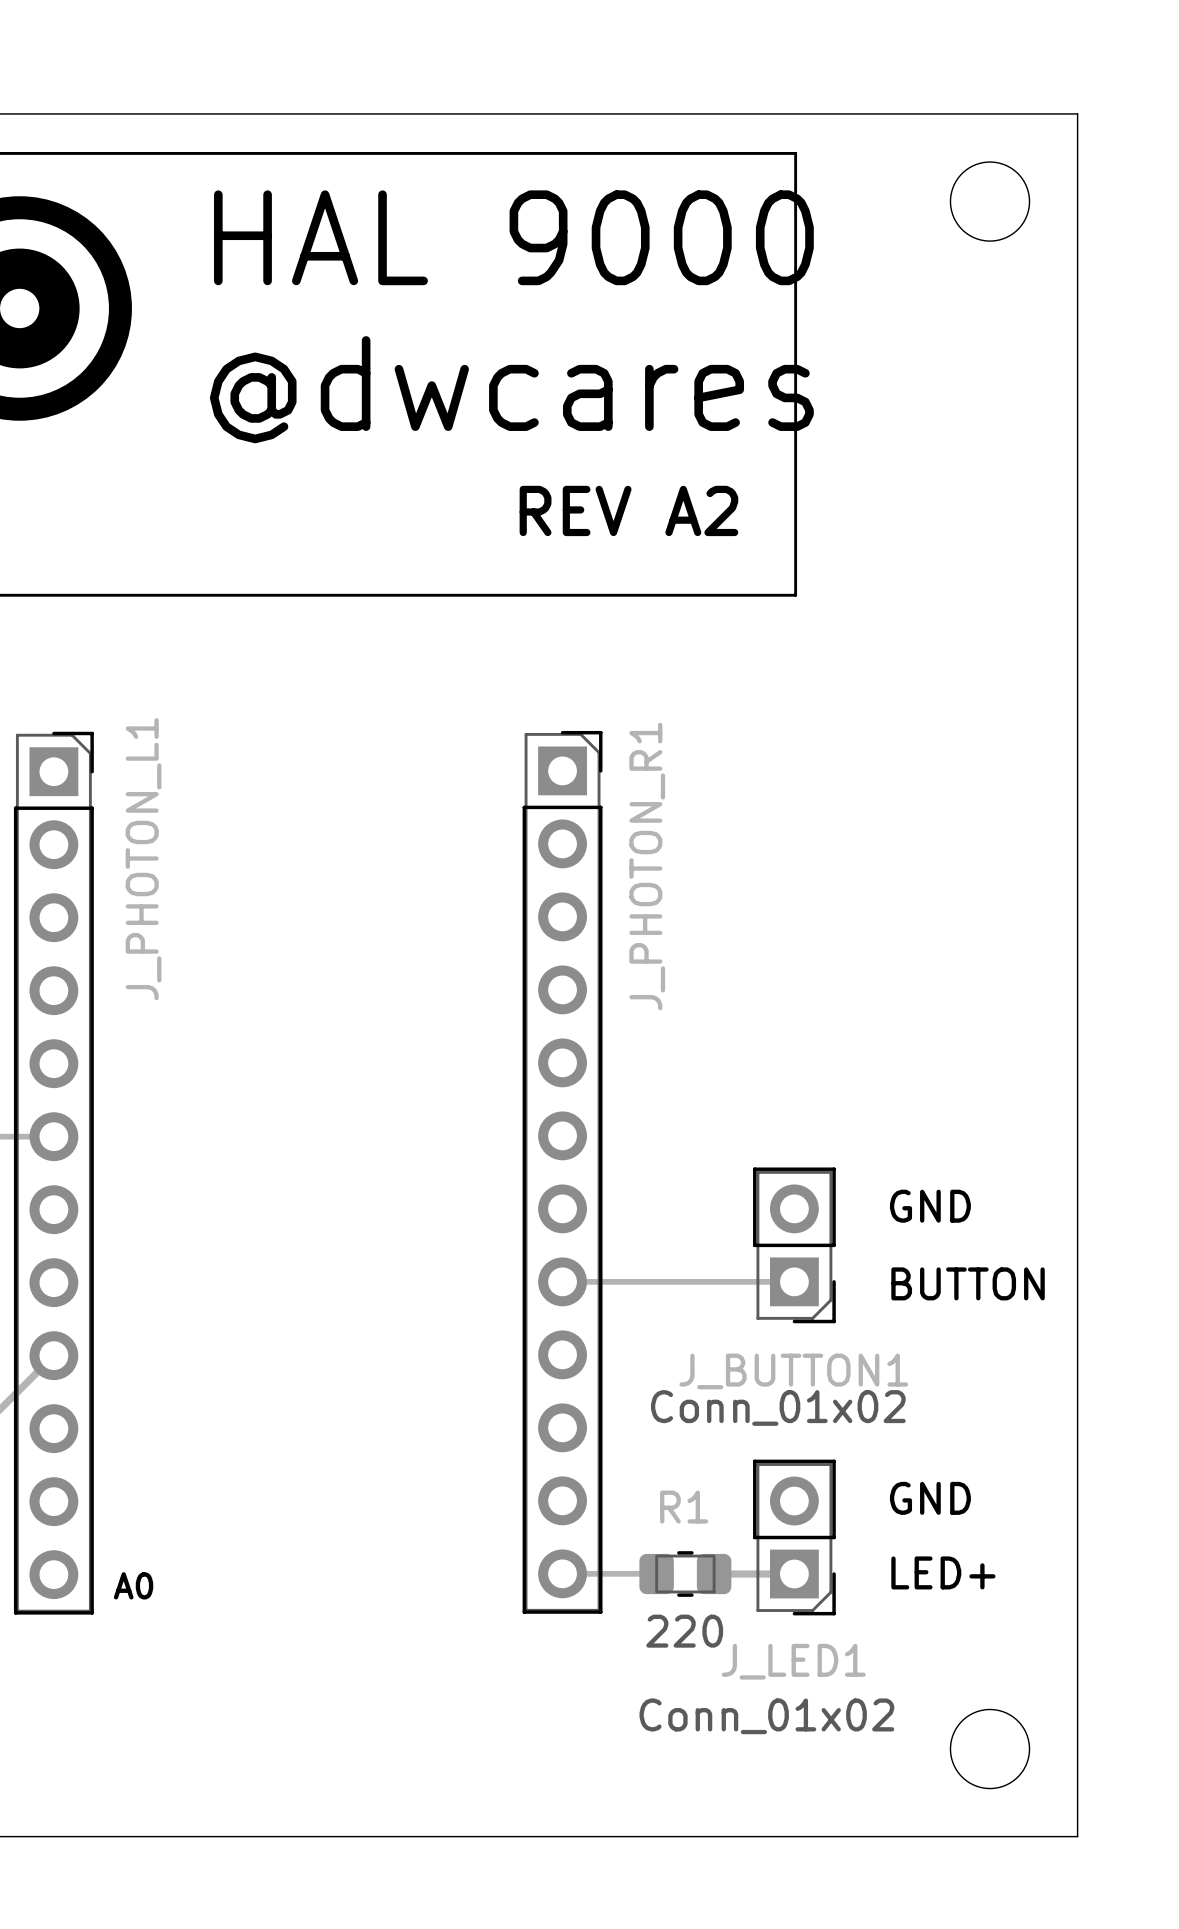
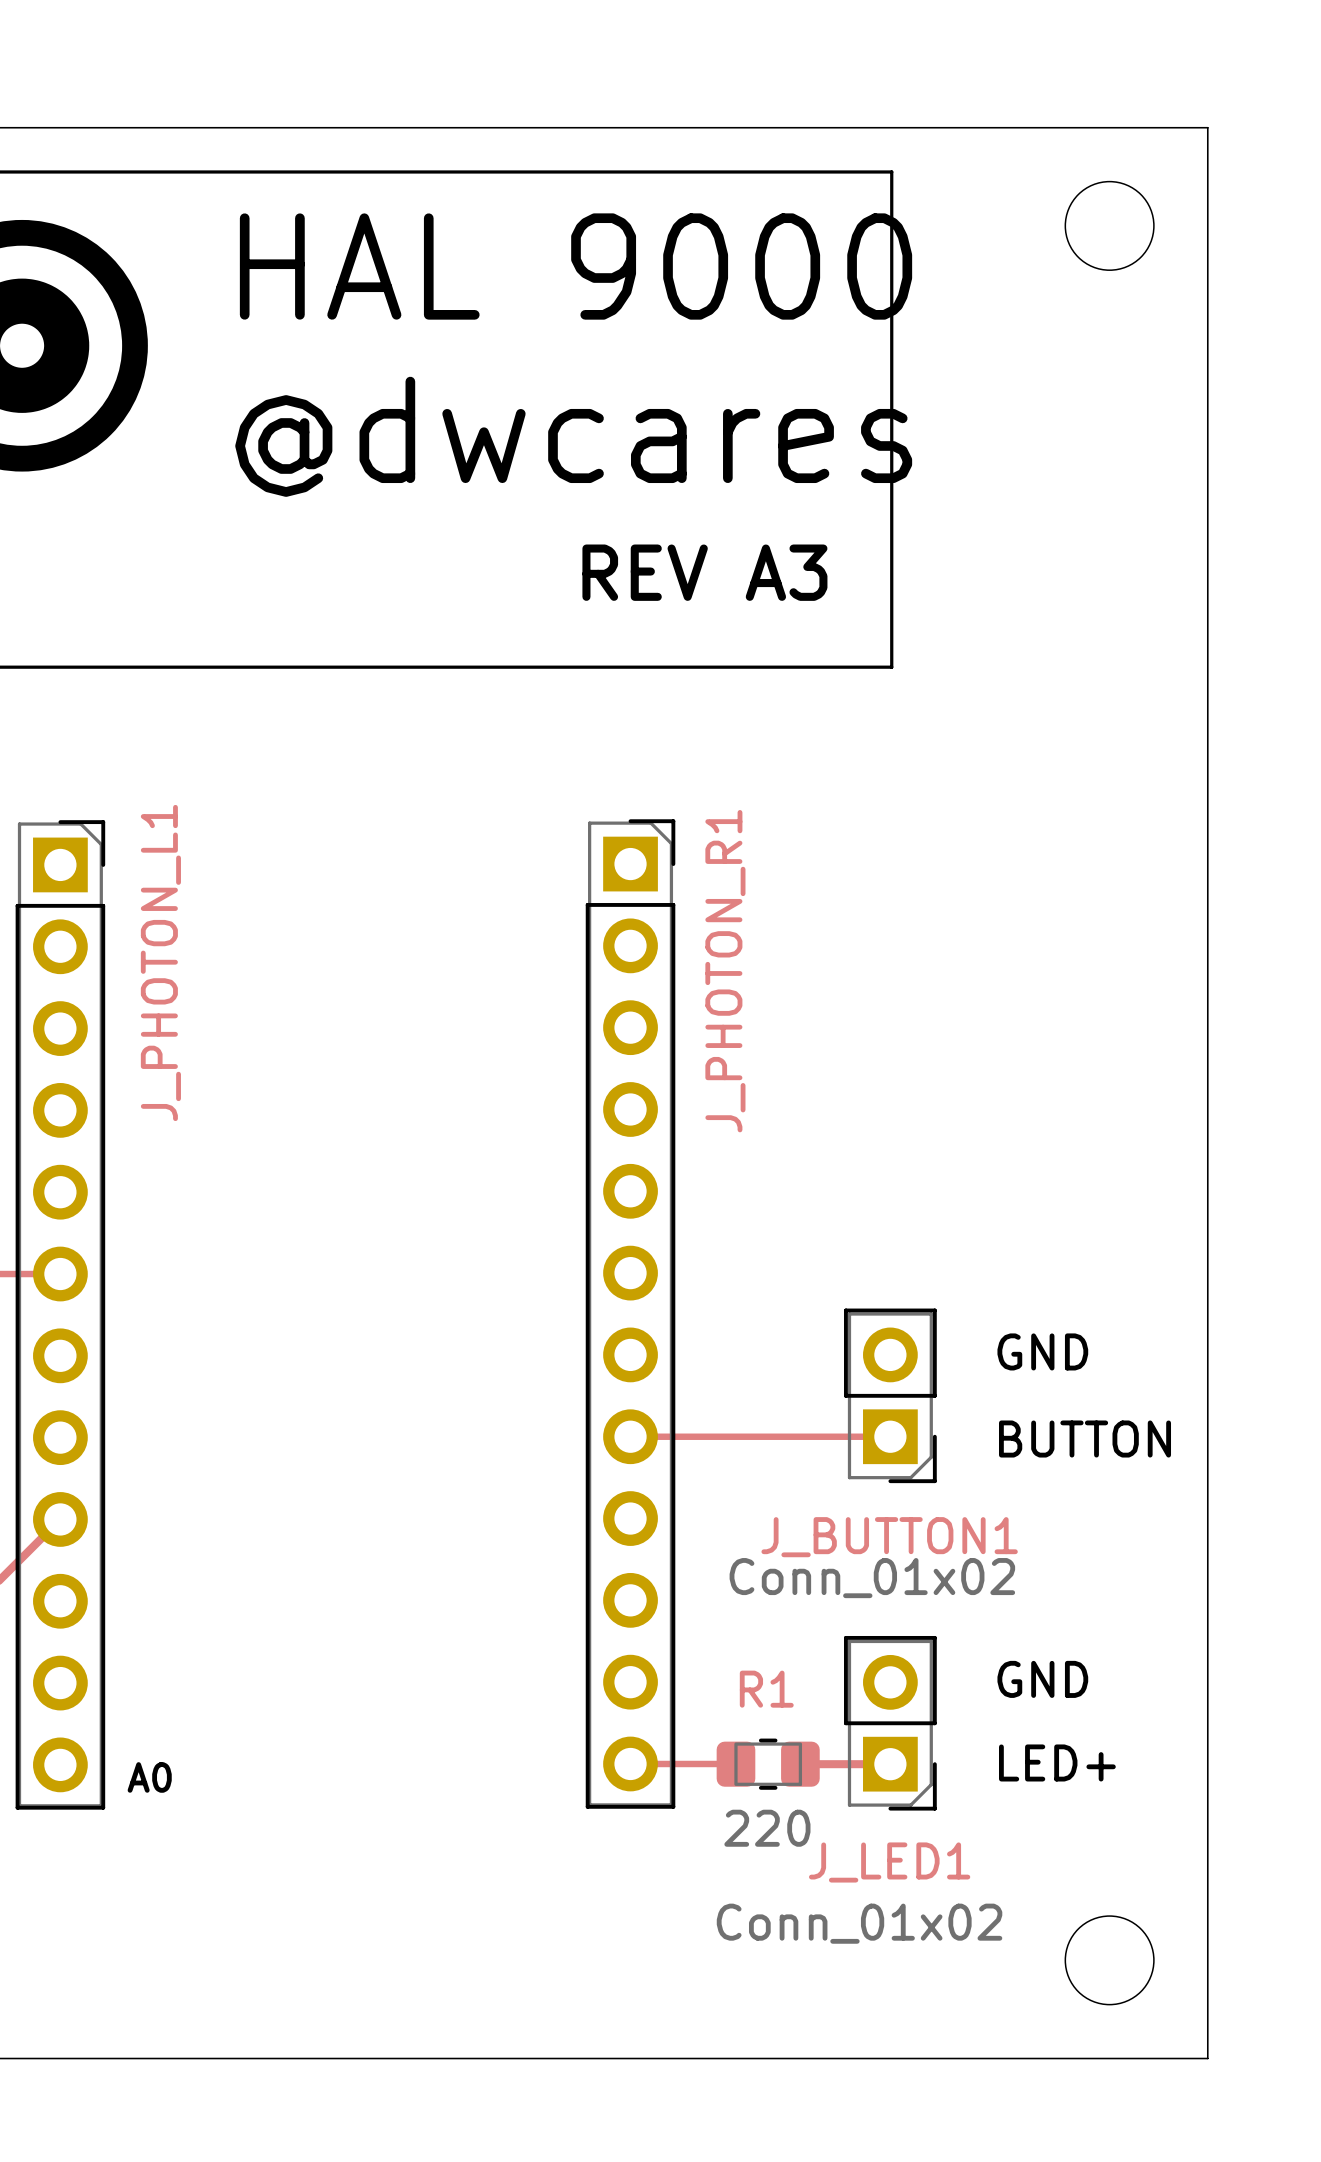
text: REV A2 (628, 510) -> REV A3 (704, 572)

